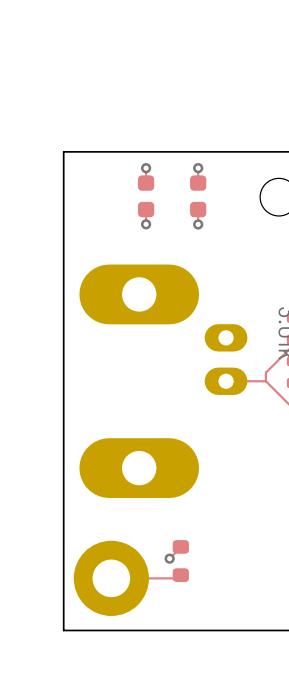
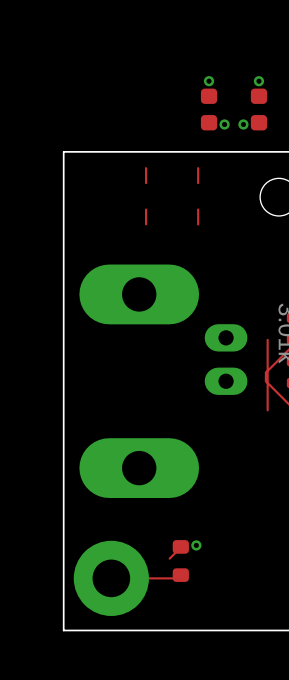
via: none -> (209, 81)
via: none -> (258, 81)
part: none -> (209, 109)
part: none -> (258, 109)
via: none -> (224, 124)
via: none -> (243, 124)
via: (146, 168) -> none
via: (198, 168) -> none
part: (146, 196) -> none
part: (198, 196) -> none
via: (146, 224) -> none
via: (198, 224) -> none
top track: none -> (267, 339) (267, 410)
top track: (265, 381) (226, 381) -> none
via position: (169, 558) -> (196, 545)

